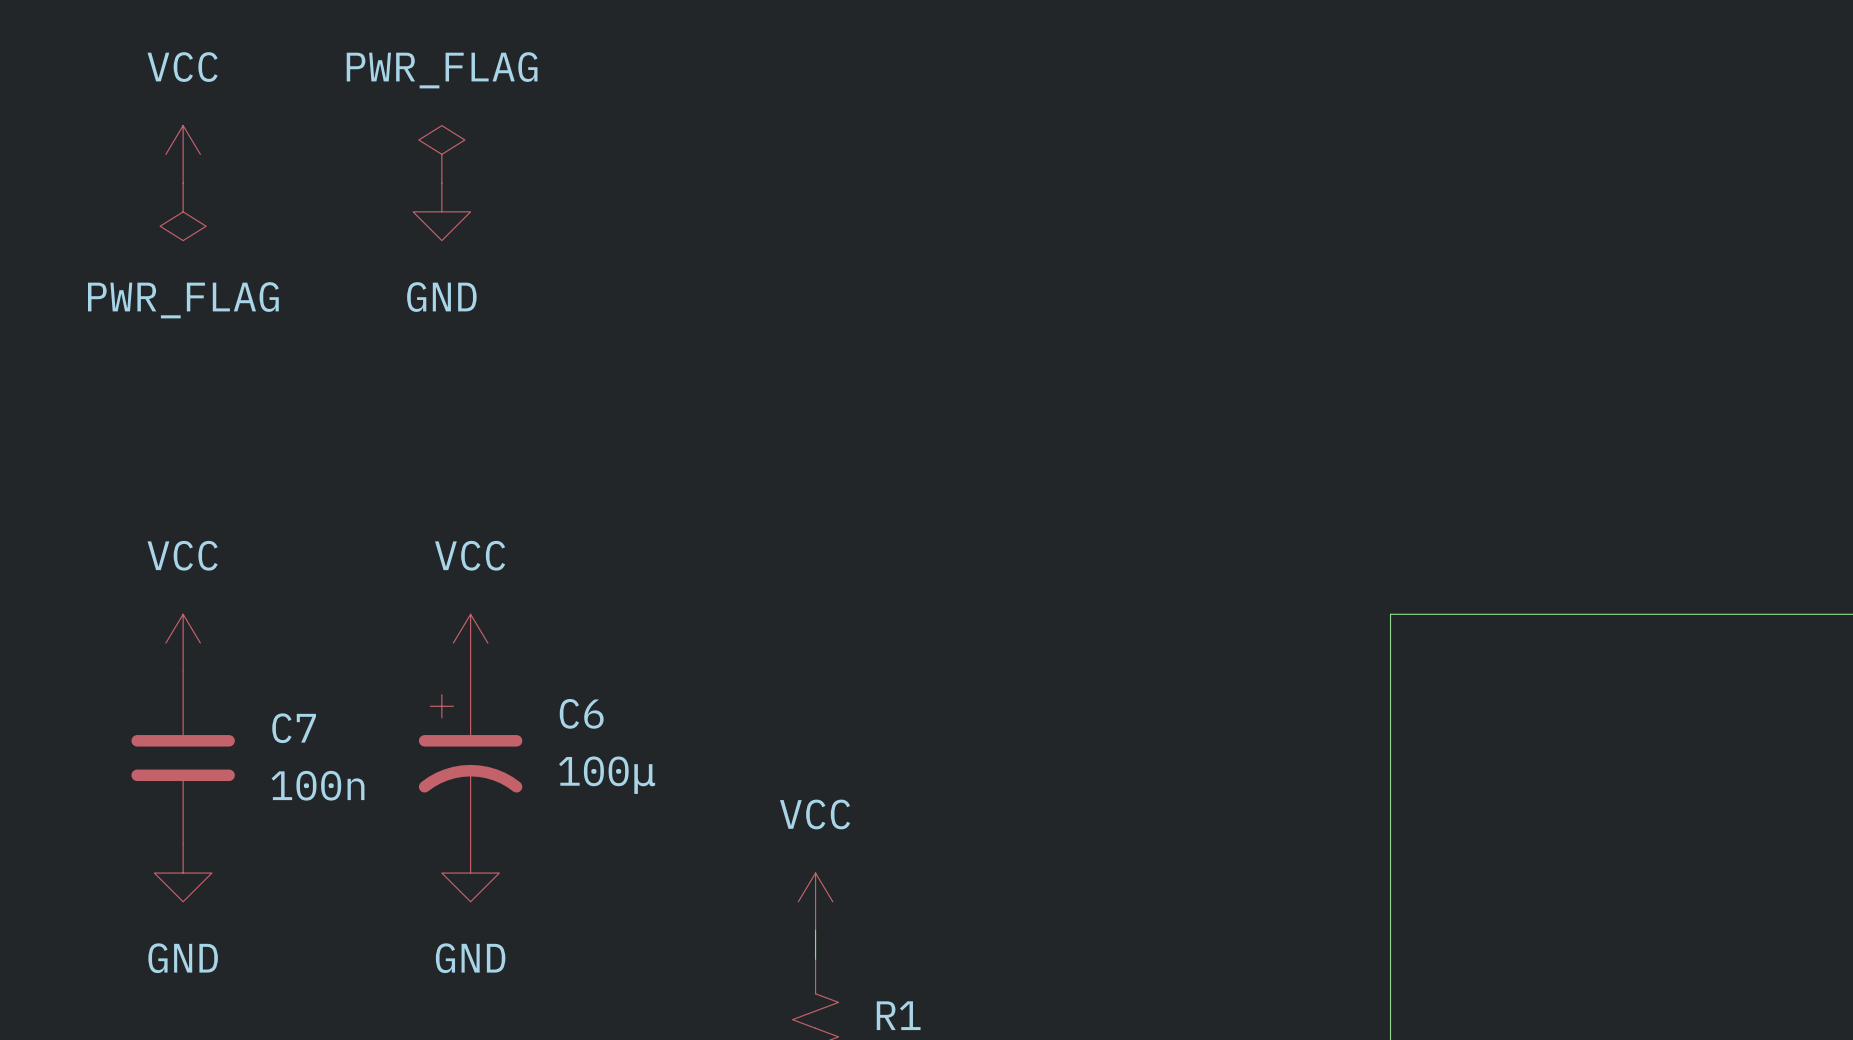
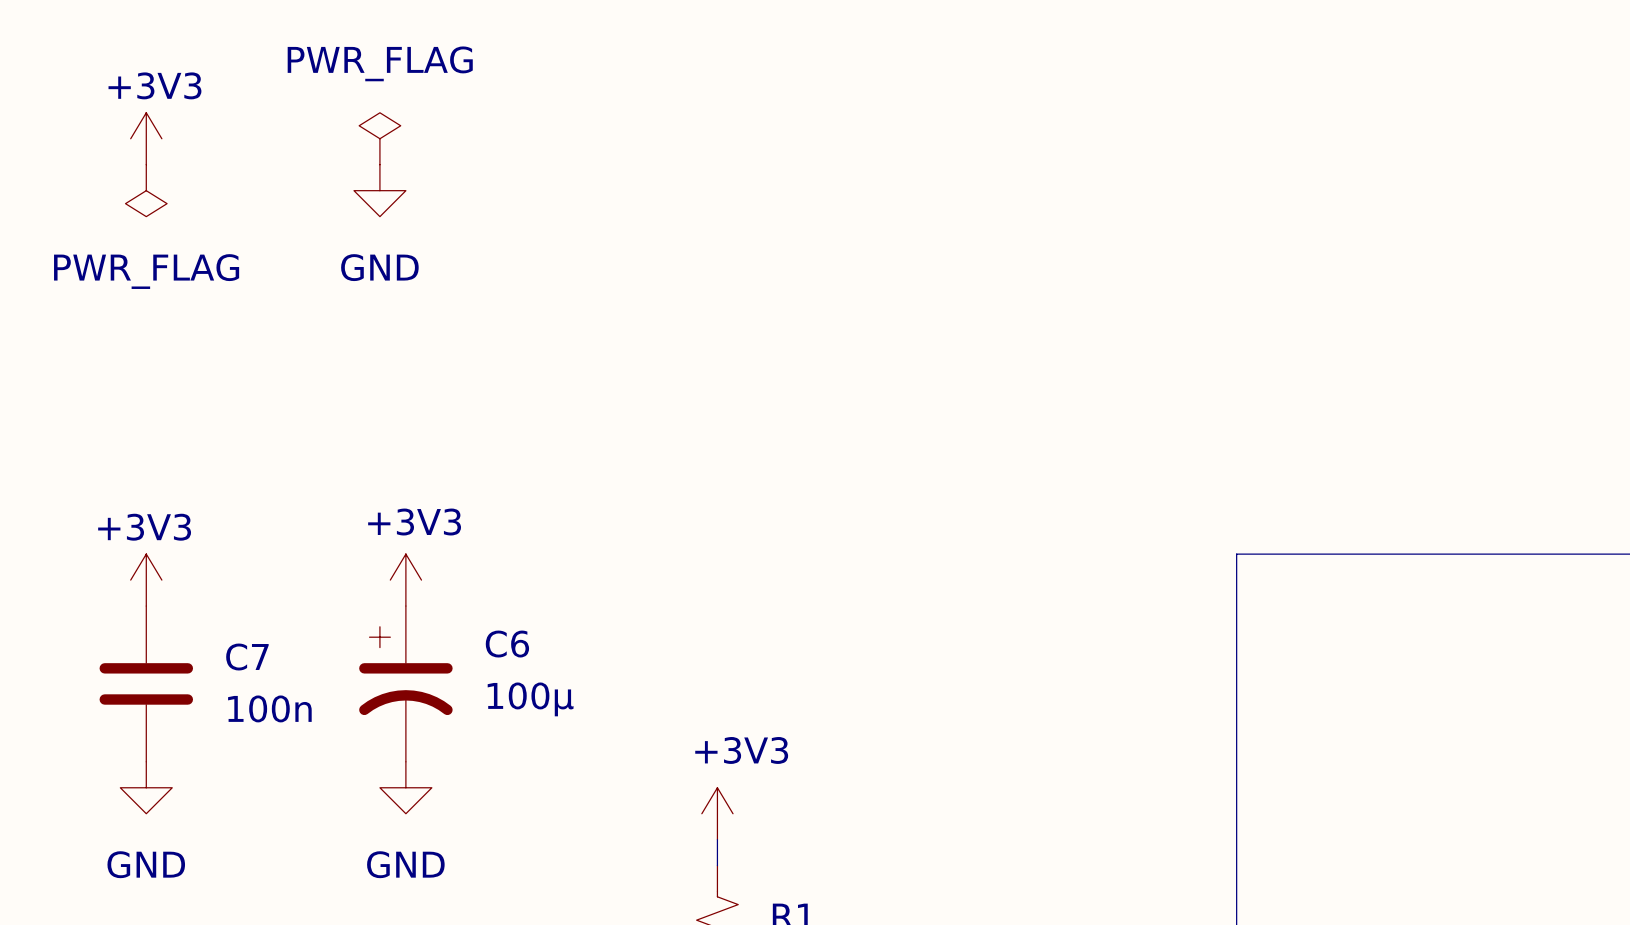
power symbol: VCC (183, 154) -> +3V3 (146, 138)
power symbol: VCC (183, 643) -> +3V3 (146, 580)
power symbol: VCC (470, 643) -> +3V3 (405, 580)
power symbol: VCC (815, 901) -> +3V3 (717, 813)

